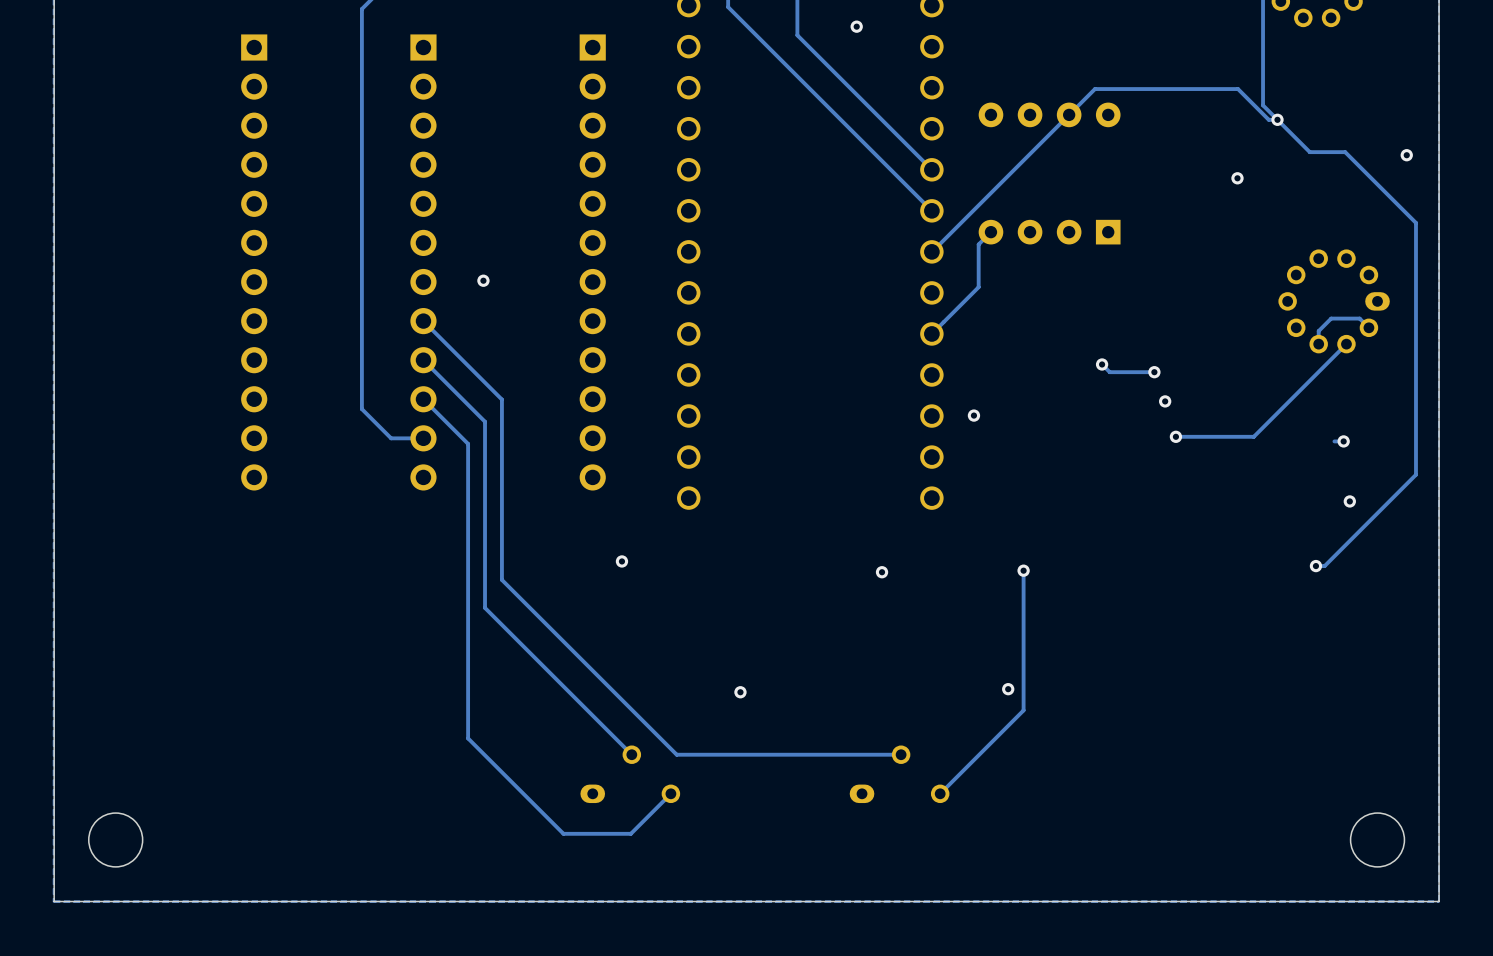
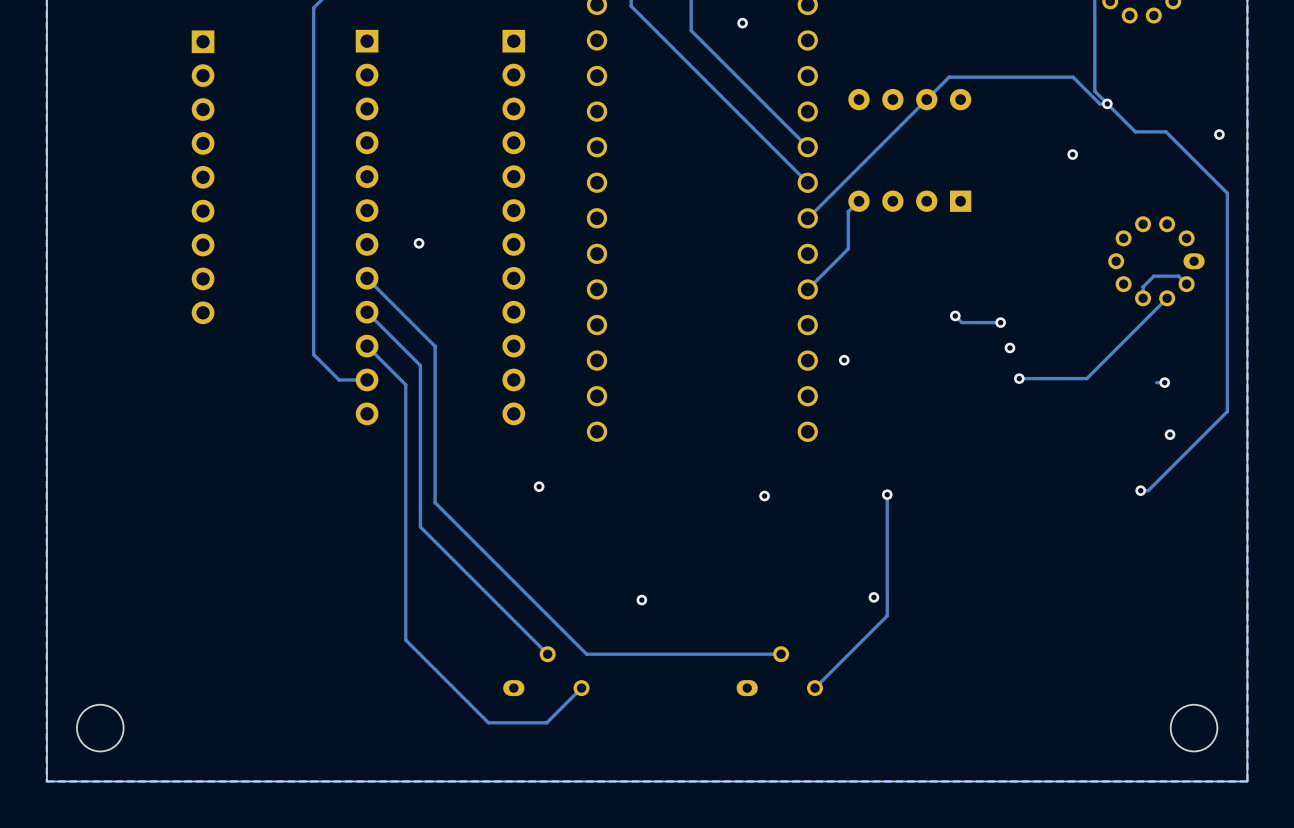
part: none -> (203, 177)
part: (254, 262) -> none

